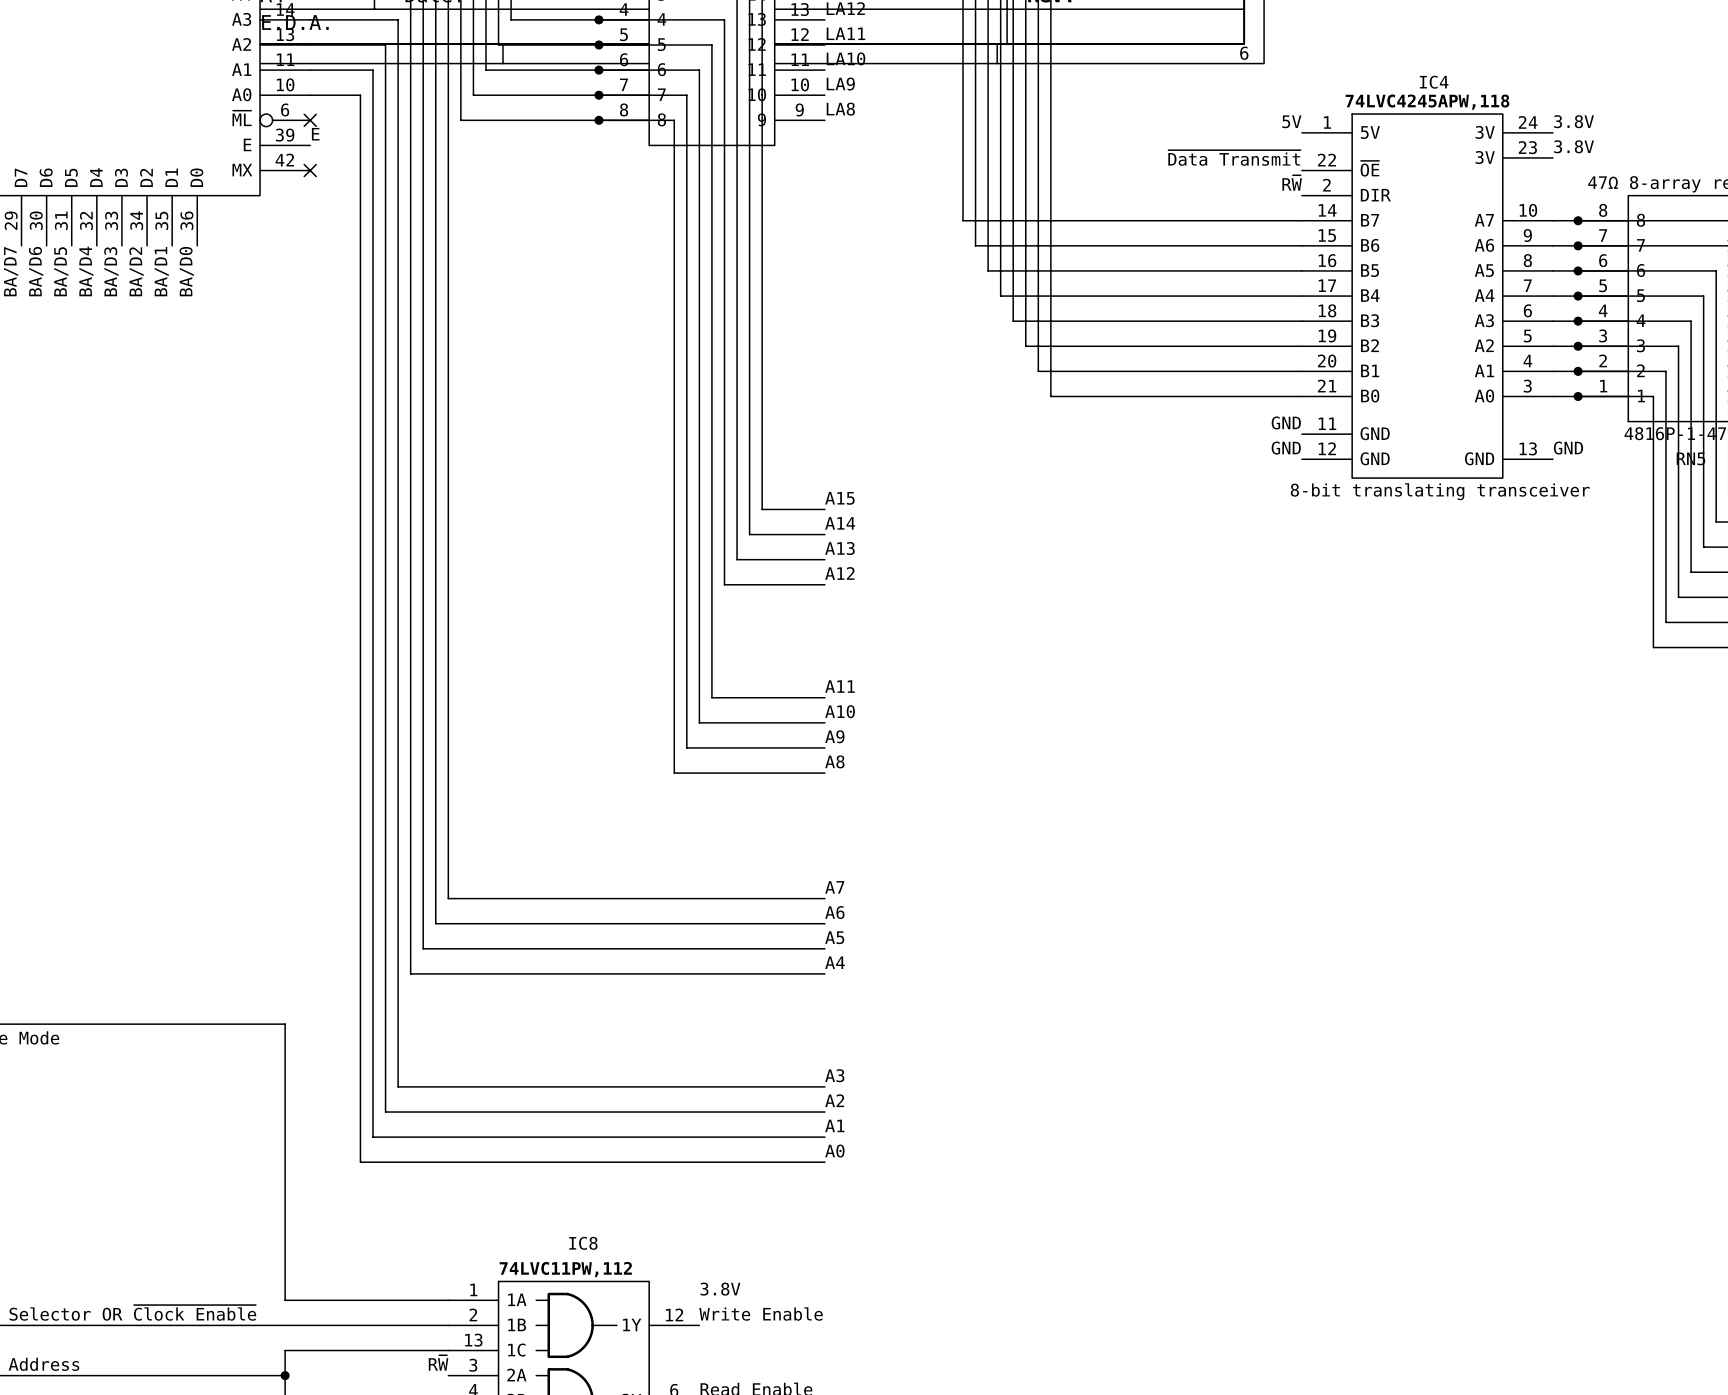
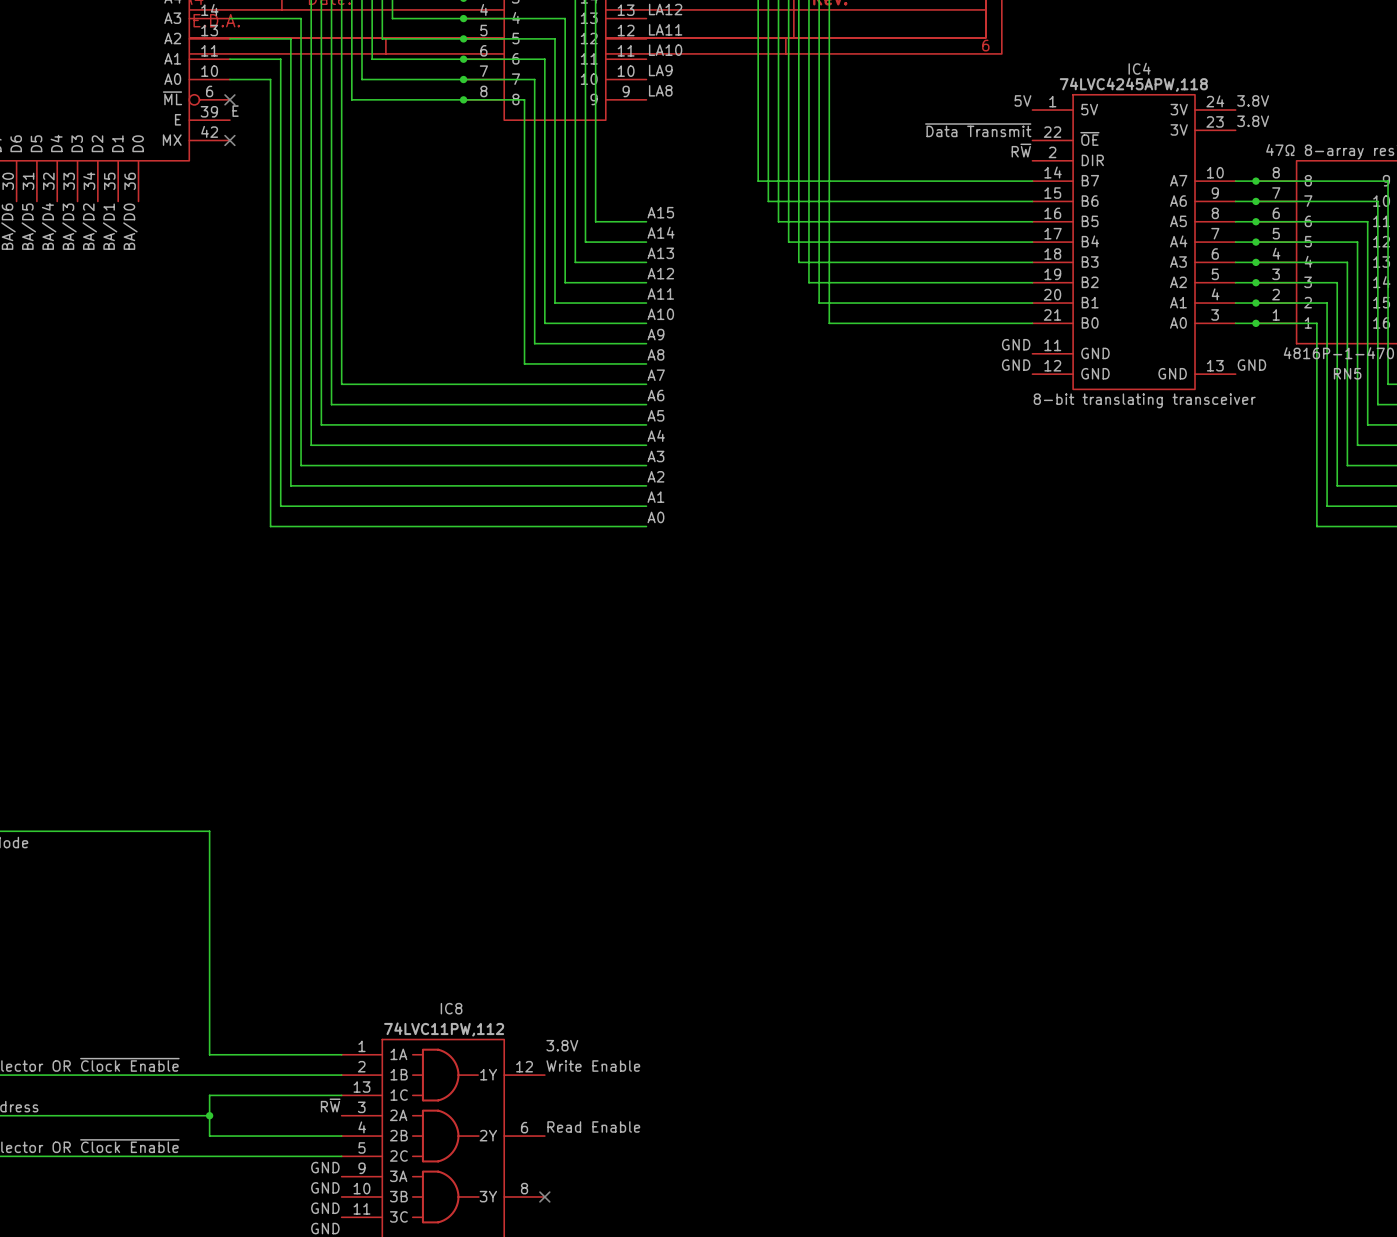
wire: (762, 270) (762, 509) (824, 509) -> (595, 221) (646, 221)
wire: (749, 296) (749, 534) (824, 534) -> (585, 242) (646, 242)
wire: (737, 321) (737, 559) (824, 559) -> (575, 262) (646, 262)
wire: (724, 346) (724, 584) (824, 584) -> (565, 282) (646, 282)
label: none -> A11 (660, 293)
wire: (711, 371) (711, 697) (824, 697) -> (555, 303) (646, 303)
label: none -> A10 (660, 314)
wire: (699, 396) (699, 722) (824, 722) -> (544, 323) (646, 323)
label: none -> A9 (655, 334)
wire: (686, 421) (686, 747) (824, 747) -> (534, 343) (646, 343)
label: none -> A8 (655, 354)
wire: (674, 446) (674, 773) (824, 773) -> (524, 363) (646, 363)
label: none -> A7 (656, 375)
wire: (448, 471) (448, 898) (824, 898) -> (341, 384) (646, 384)
label: none -> A6 (655, 395)
wire: (435, 496) (435, 923) (824, 923) -> (331, 404) (646, 404)
label position: A15 (839, 498) -> A15 (660, 212)
label: none -> A5 (655, 415)
wire: (423, 522) (423, 948) (824, 948) -> (321, 424) (646, 424)
label position: A14 (840, 523) -> A14 (661, 232)
label: none -> A4 (656, 435)
wire: (410, 547) (410, 973) (824, 973) -> (311, 445) (646, 445)
label position: A13 (839, 548) -> A13 (660, 253)
label: none -> A3 (655, 456)
wire: (398, 572) (398, 1086) (824, 1086) -> (301, 465) (646, 465)
label position: A12 (839, 573) -> A12 (660, 273)
label: none -> A2 (655, 476)
wire: (385, 597) (385, 1112) (824, 1112) -> (290, 485) (646, 485)
label: none -> A1 (655, 497)
wire: (373, 622) (373, 1137) (824, 1137) -> (280, 506) (646, 506)
label: none -> A0 (655, 517)
wire: (360, 647) (360, 1162) (824, 1162) -> (270, 526) (646, 526)
label: A11 (840, 686) -> none
label: A10 (840, 711) -> none
label: A9 (834, 736) -> none
label: A8 (834, 761) -> none
label: A7 (834, 887) -> none
label: A6 (834, 912) -> none
label: A5 (834, 937) -> none
label: A4 (835, 962) -> none
label: A3 (834, 1075) -> none
label: A2 (834, 1100) -> none
label: A1 (834, 1125) -> none
label: A0 (834, 1151) -> none

